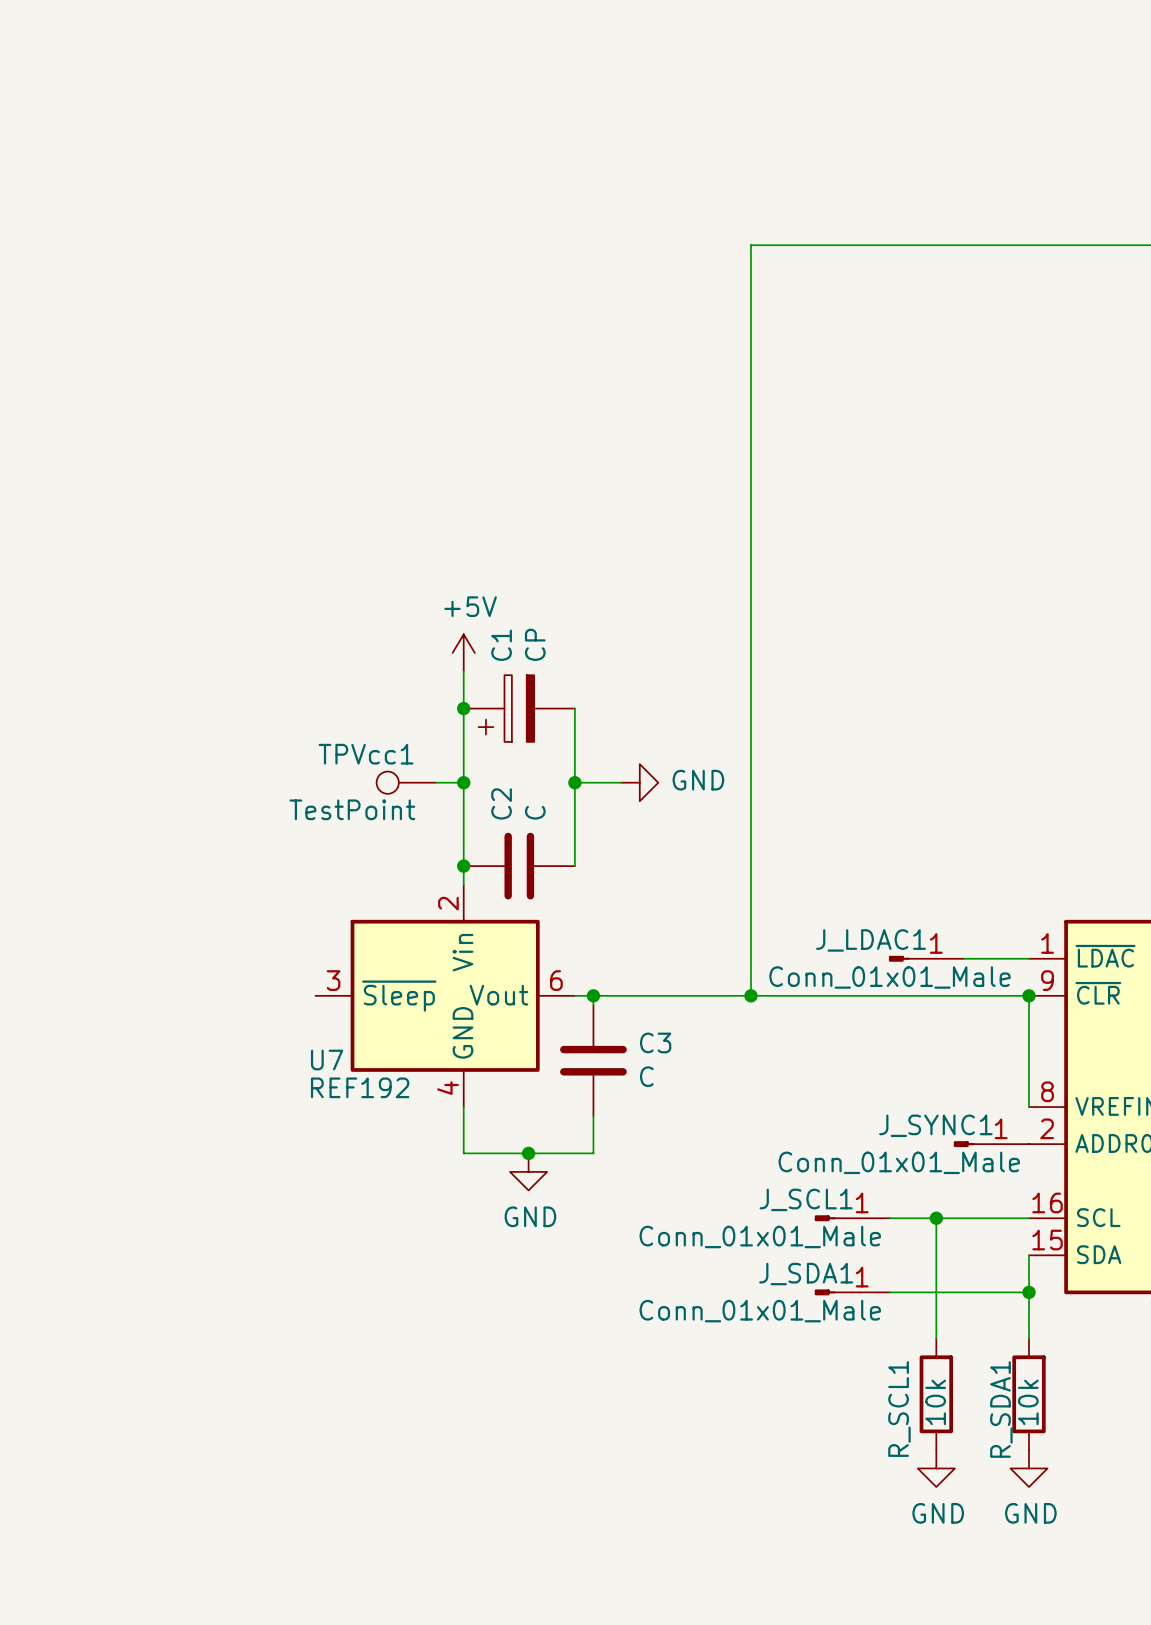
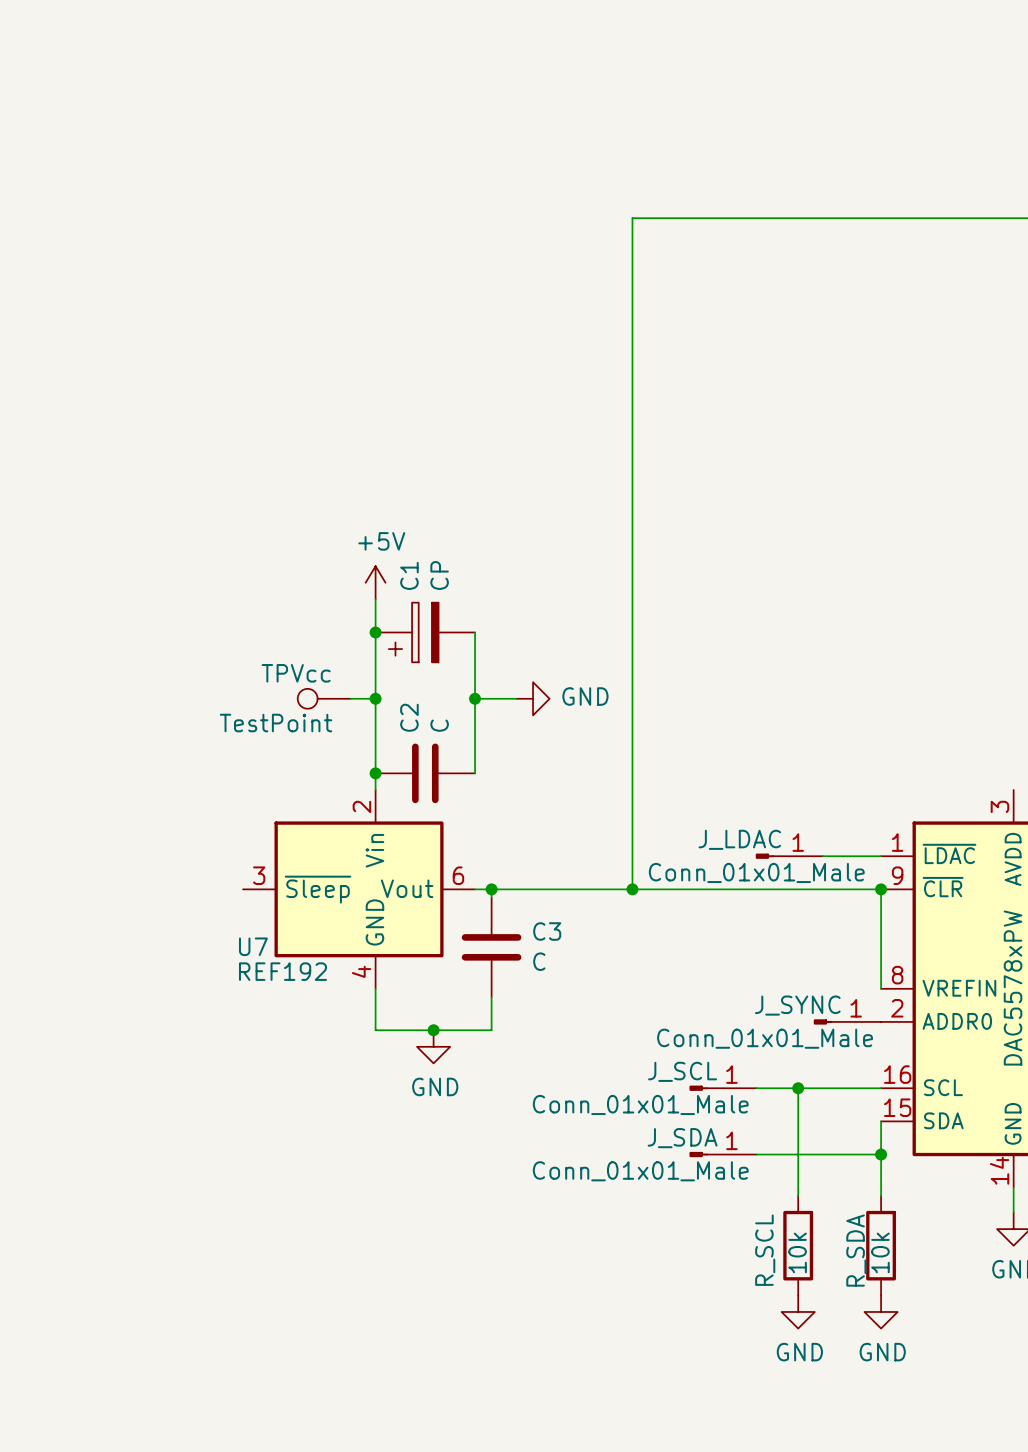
TPVcc1 name: TPVcc1 (366, 754) -> TPVcc (296, 673)
J_LDAC1 name: J_LDAC1 (871, 940) -> J_LDAC (739, 839)
J_SYNC1 name: J_SYNC1 (935, 1125) -> J_SYNC (797, 1005)
J_SCL1 name: J_SCL1 (806, 1199) -> J_SCL (682, 1071)
J_SDA1 name: J_SDA1 (806, 1274) -> J_SDA (682, 1138)
R_SCL1 name: R_SCL1 (899, 1409) -> R_SCL (765, 1250)
R_SDA1 name: R_SDA1 (1001, 1409) -> R_SDA (856, 1250)

